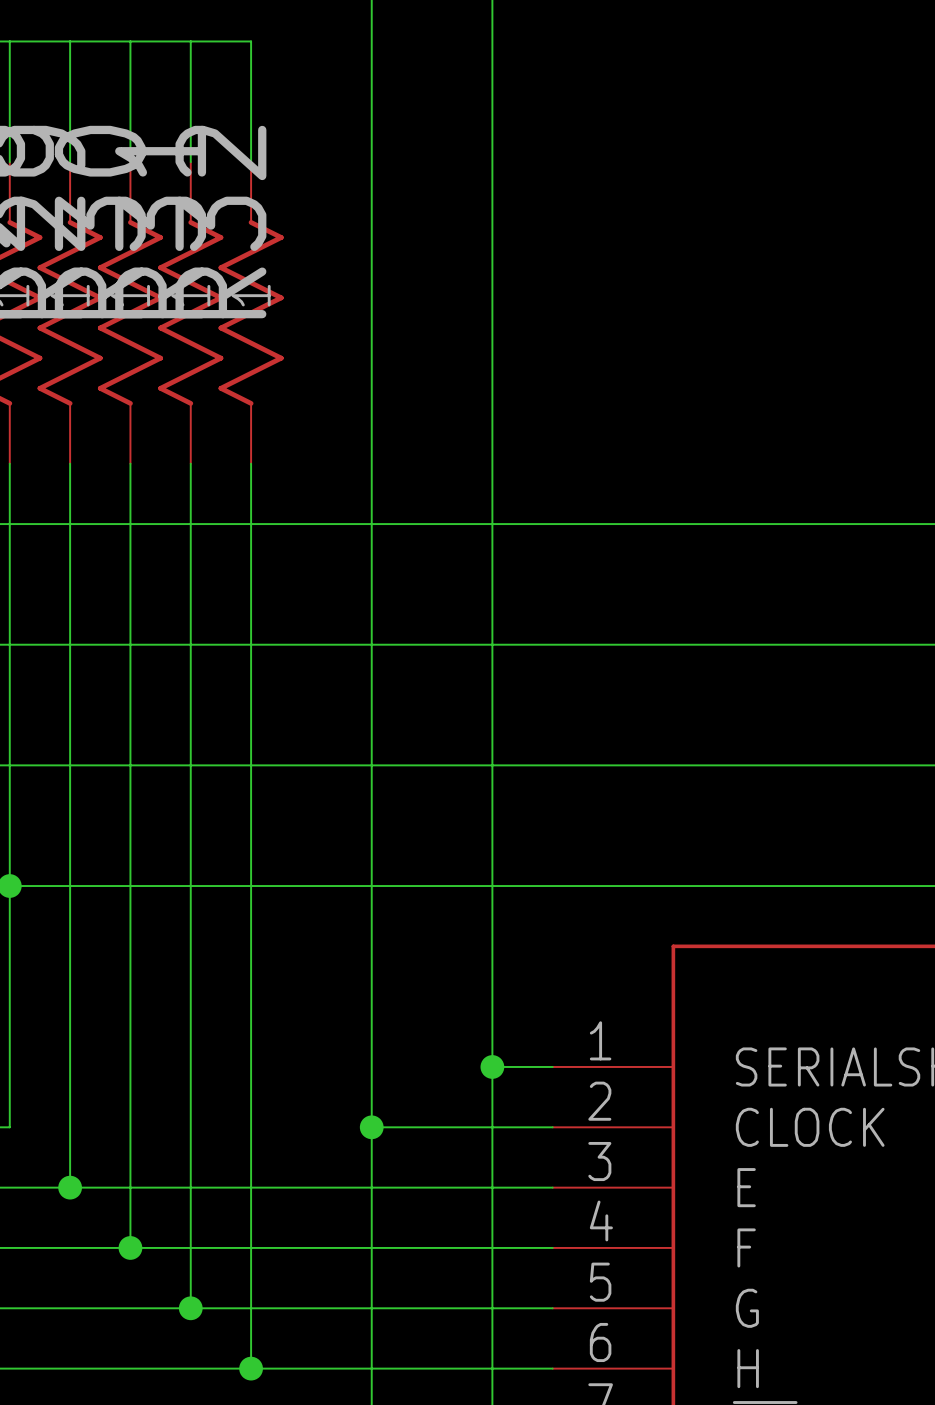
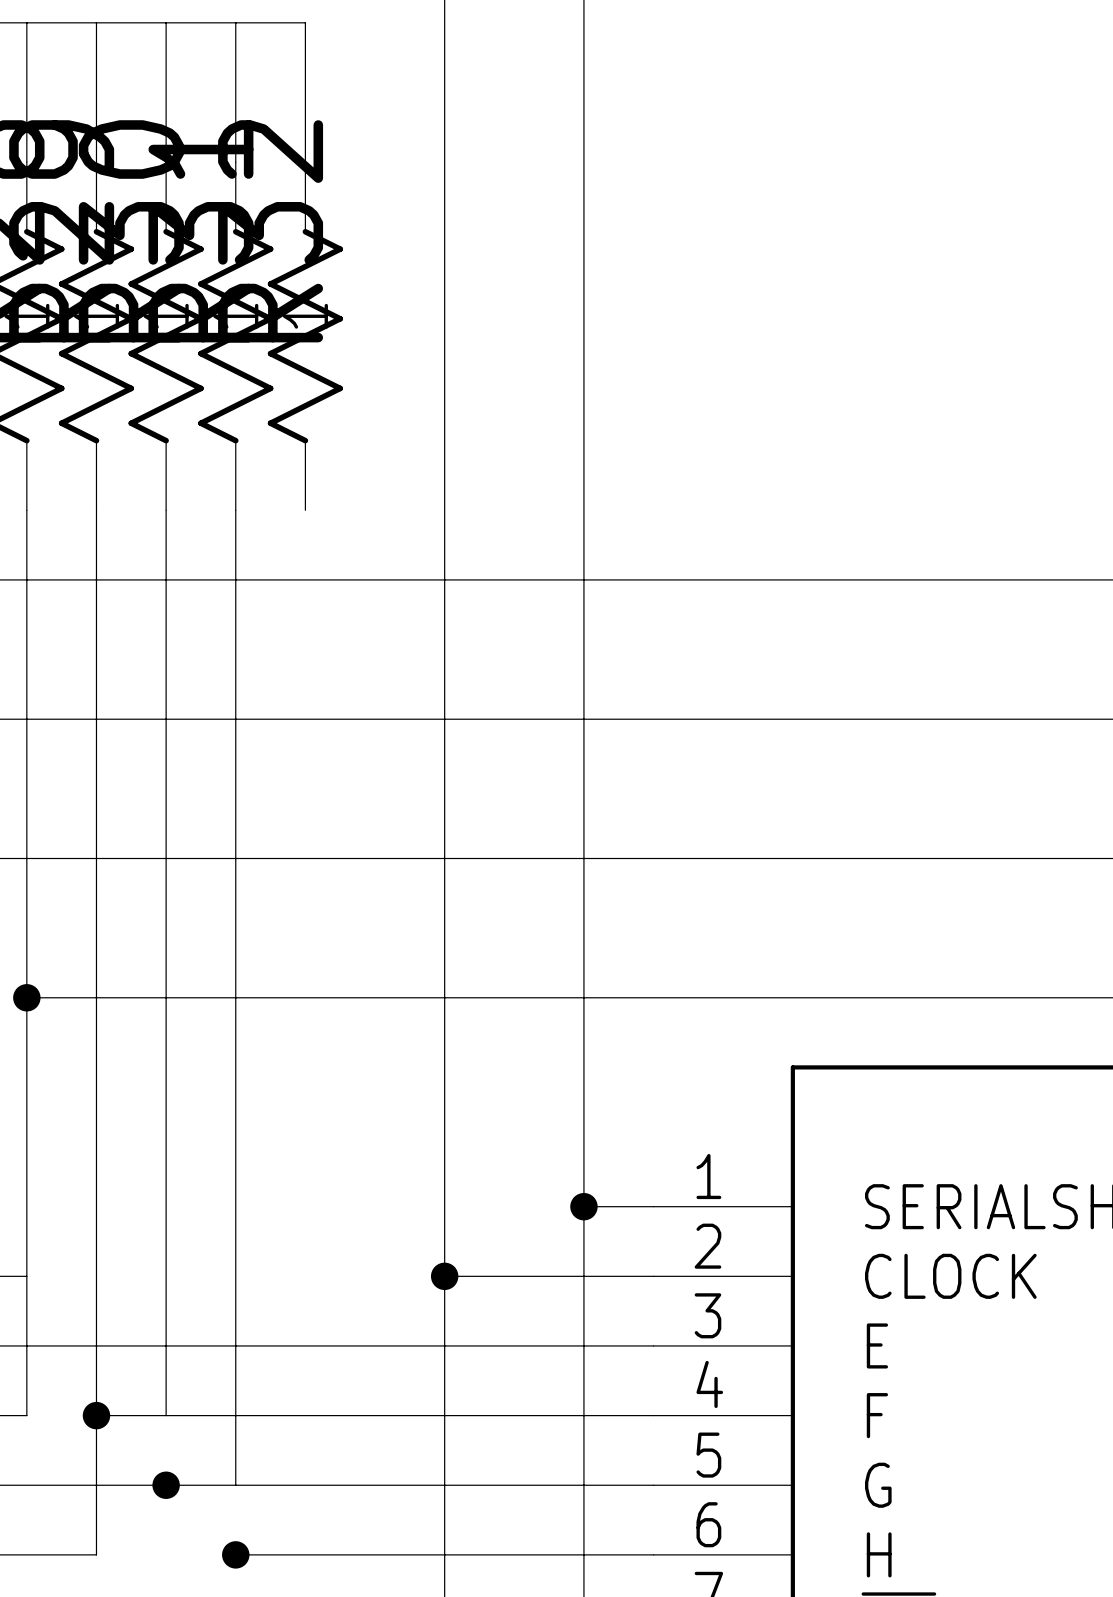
wire: (251, 463) (251, 1368) -> none
junction: (70, 1187) -> none
wire: (9, 1247) (70, 1247) -> (26, 1415) (26, 1276)
junction: none -> (96, 1415)
junction: (130, 1247) -> none
junction: none -> (166, 1485)
junction: (190, 1308) -> none
wire: (70, 1368) (190, 1368) -> (96, 1554) (96, 1345)
junction: none -> (235, 1554)
junction: (251, 1368) -> none

